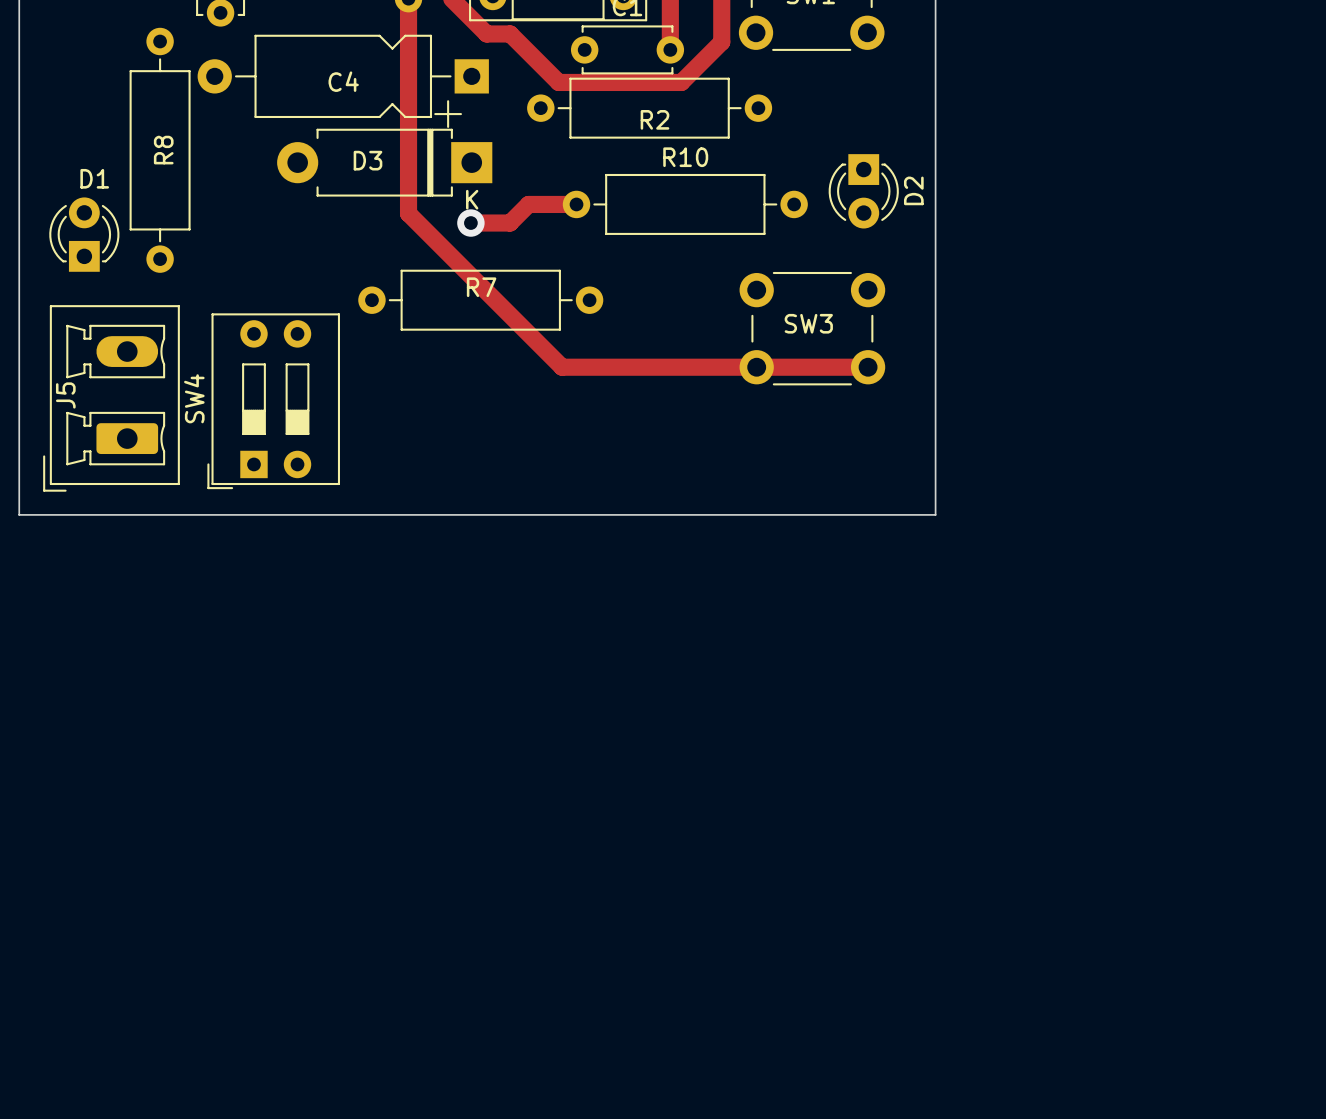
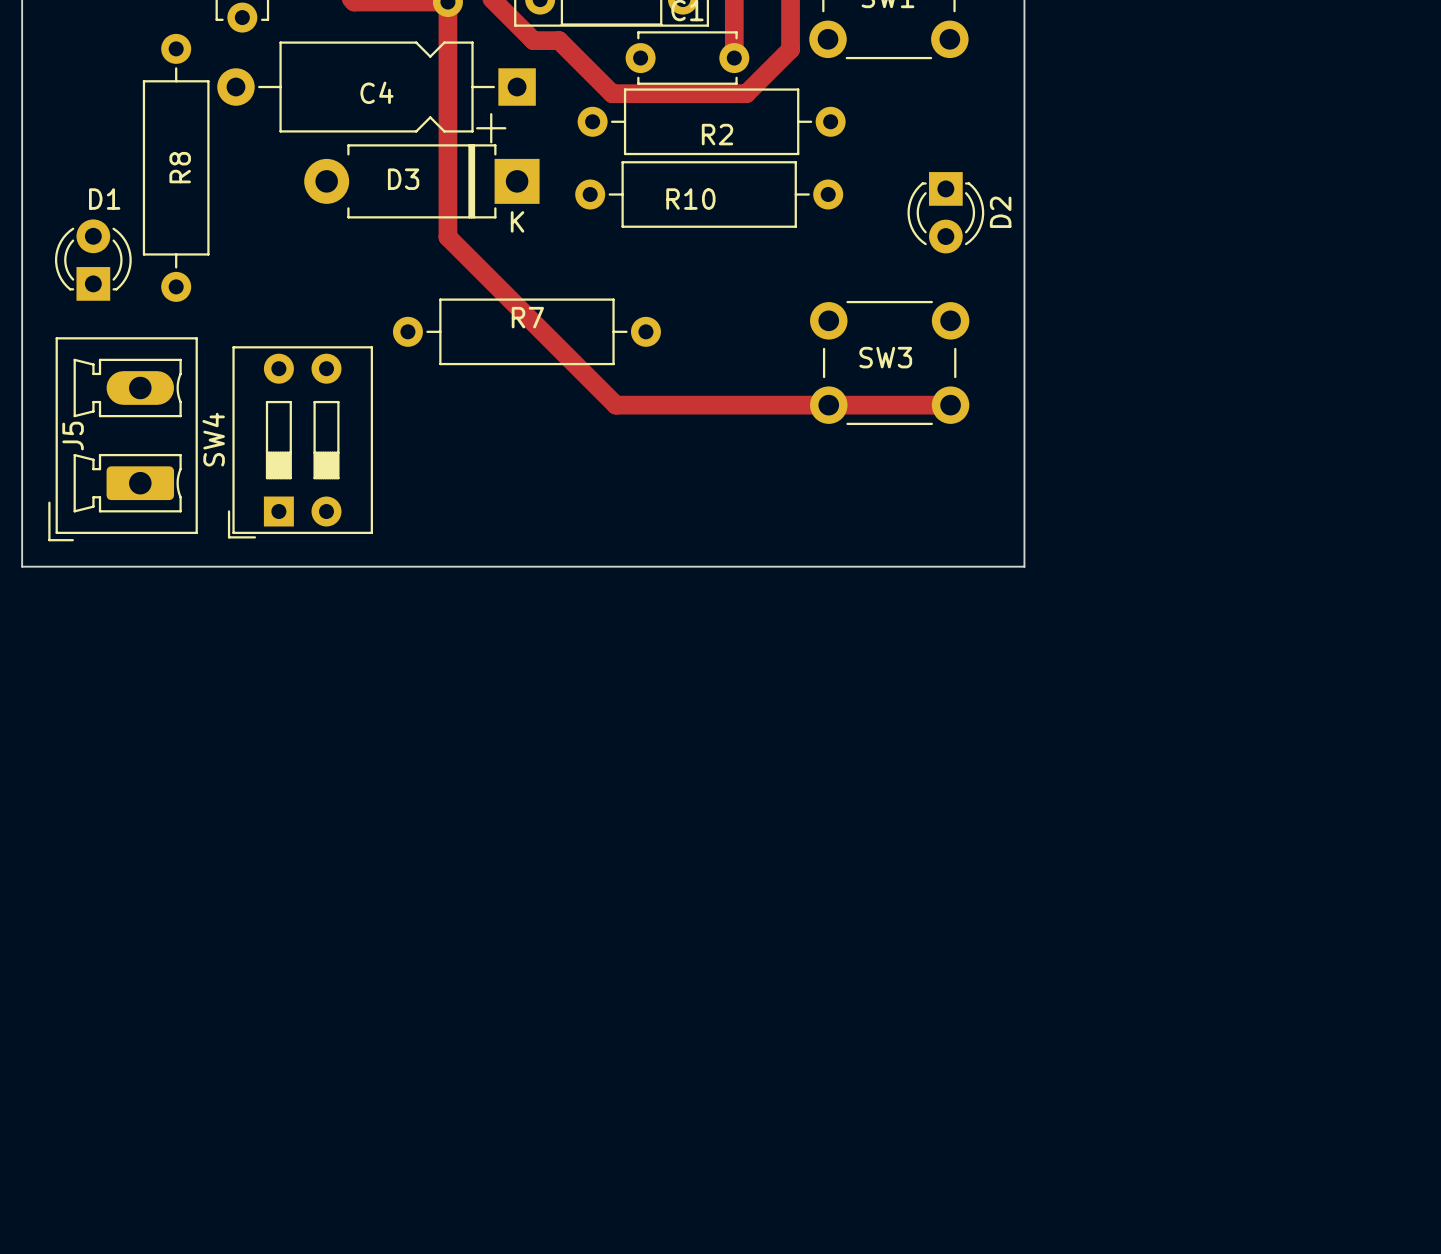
R10 name position: R10 (685, 157) -> R10 (690, 199)
track: (576, 204) (528, 204) (510, 223) (470, 223) -> none
R10 position: (685, 204) -> (709, 194)
via: (470, 223) -> none

